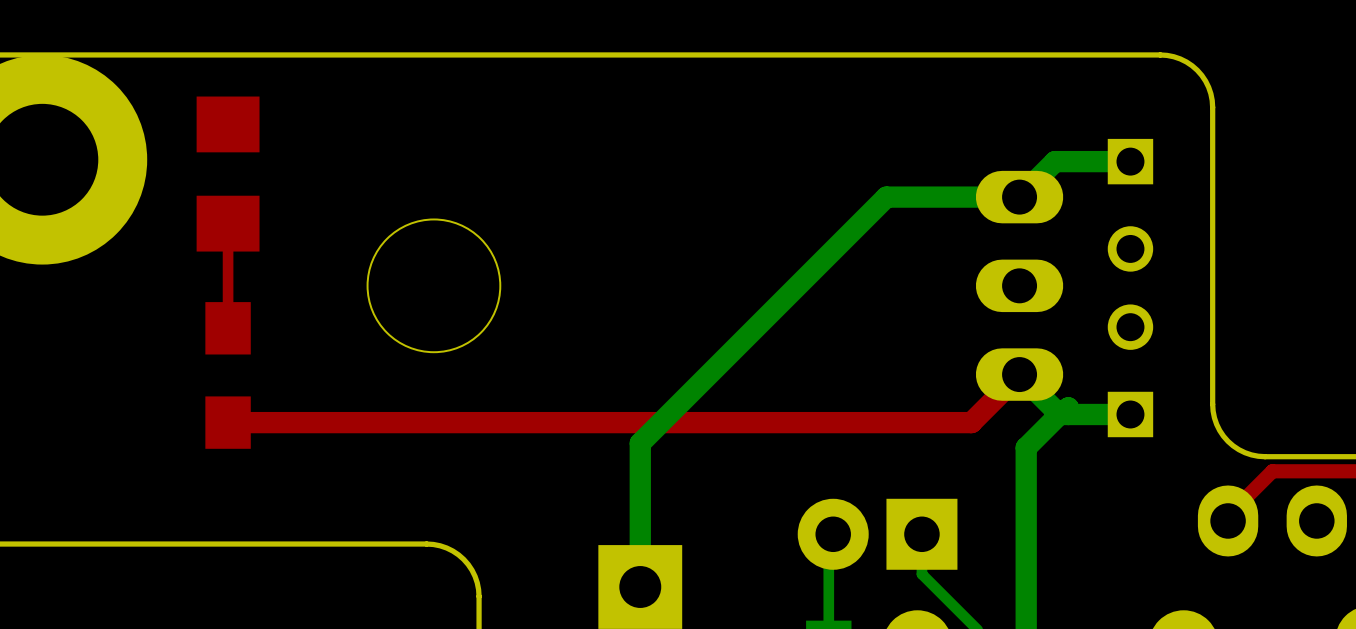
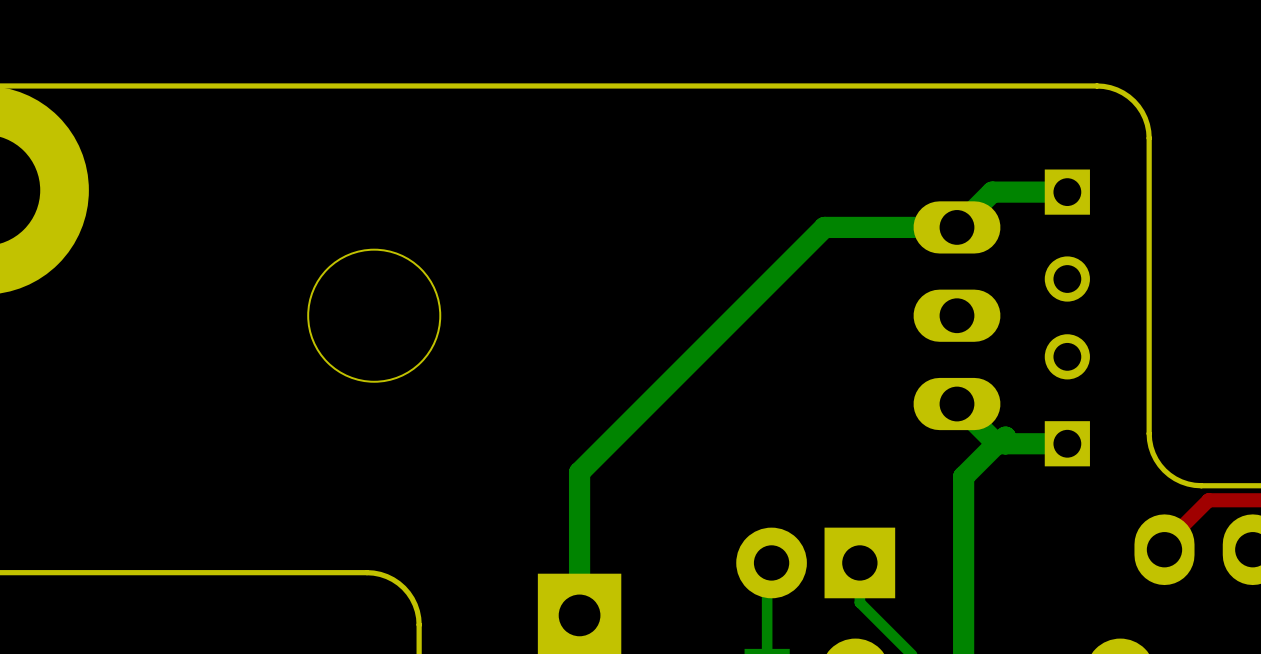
part: (228, 174) -> none
top track: (228, 223) (228, 328) -> none
top track: (1019, 374) (971, 422) (228, 422) -> none
part: (228, 375) -> none

